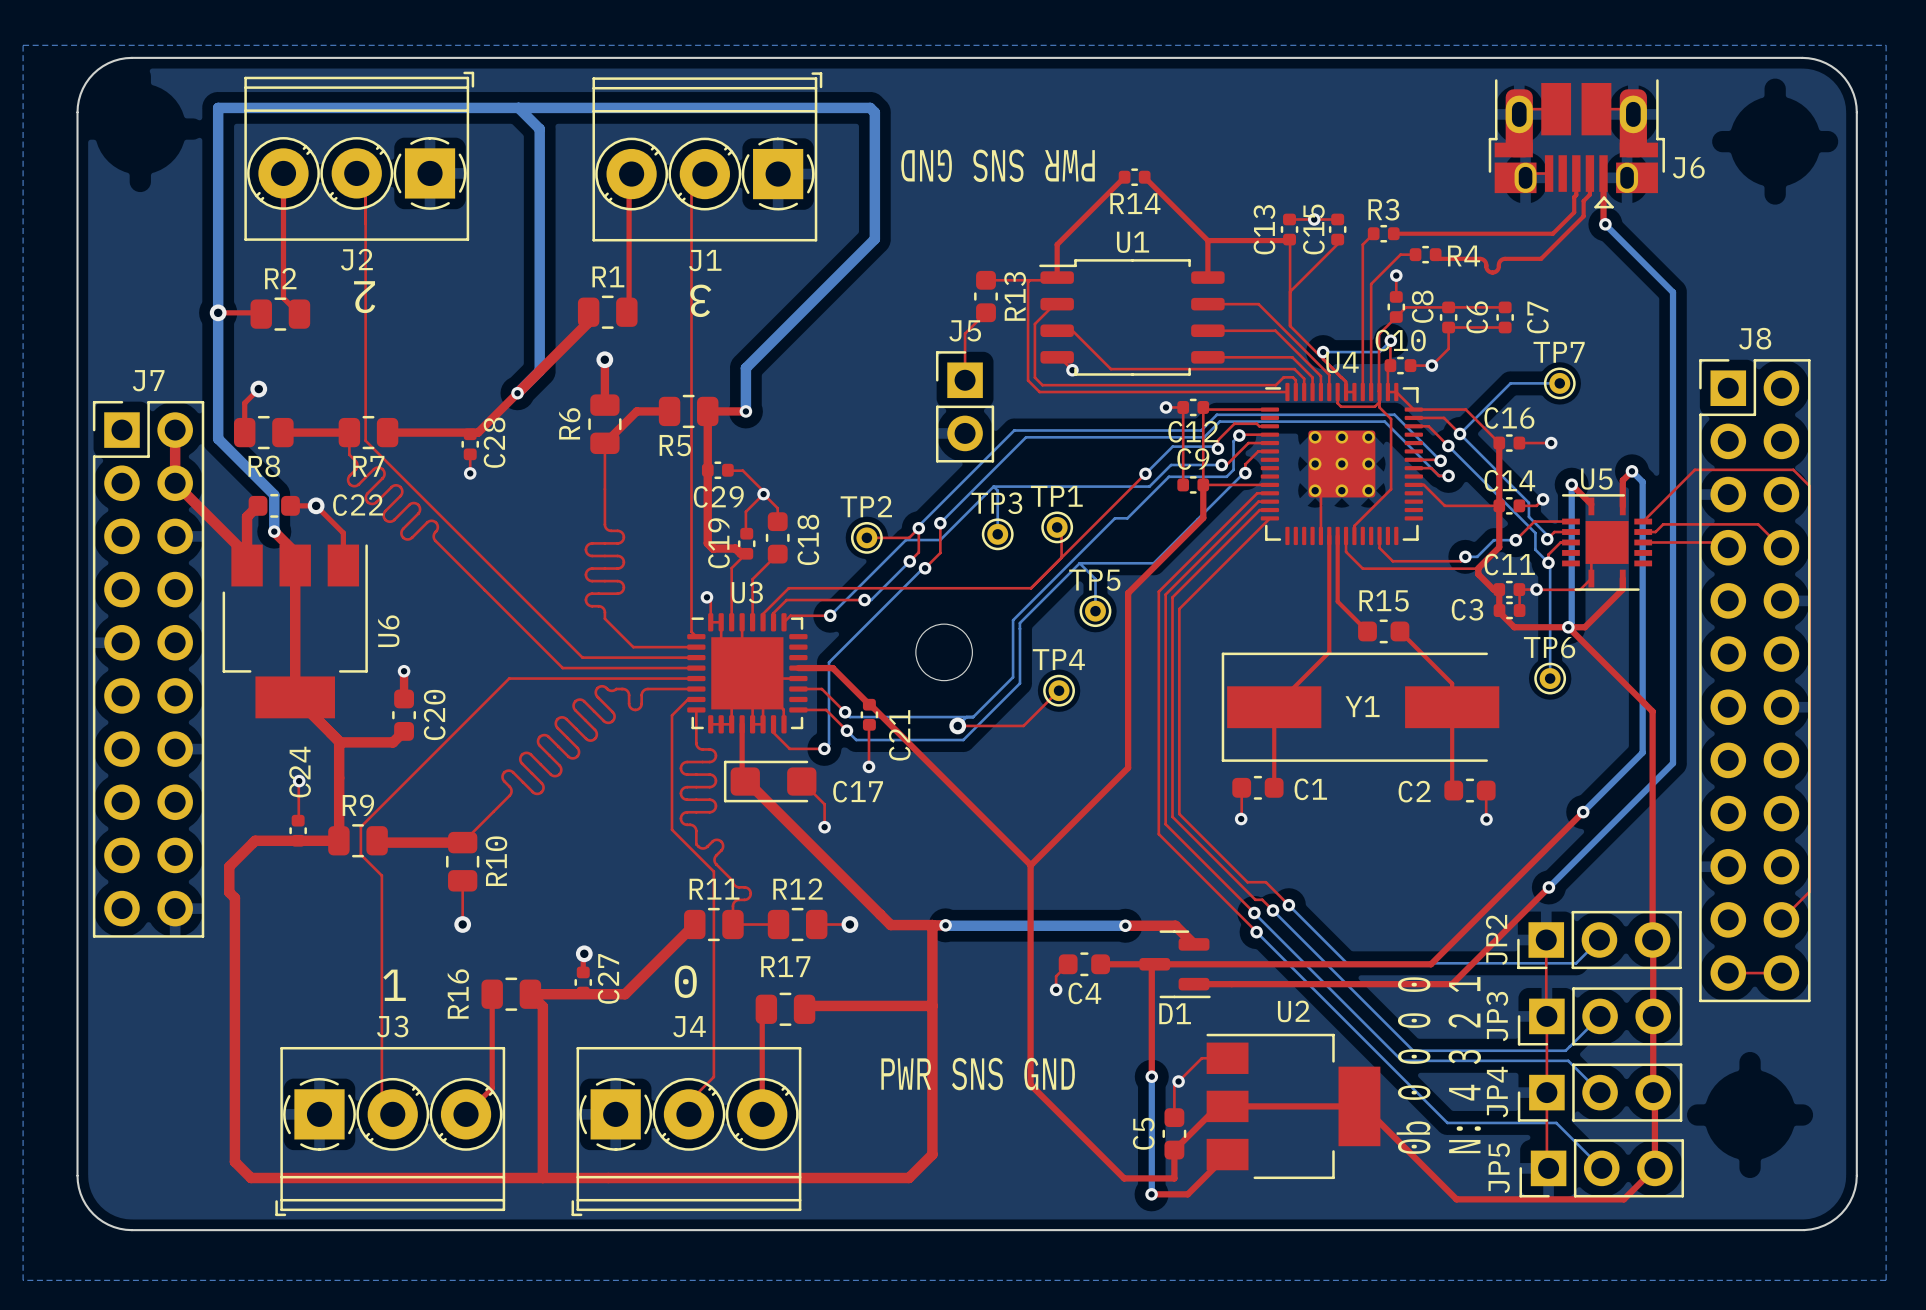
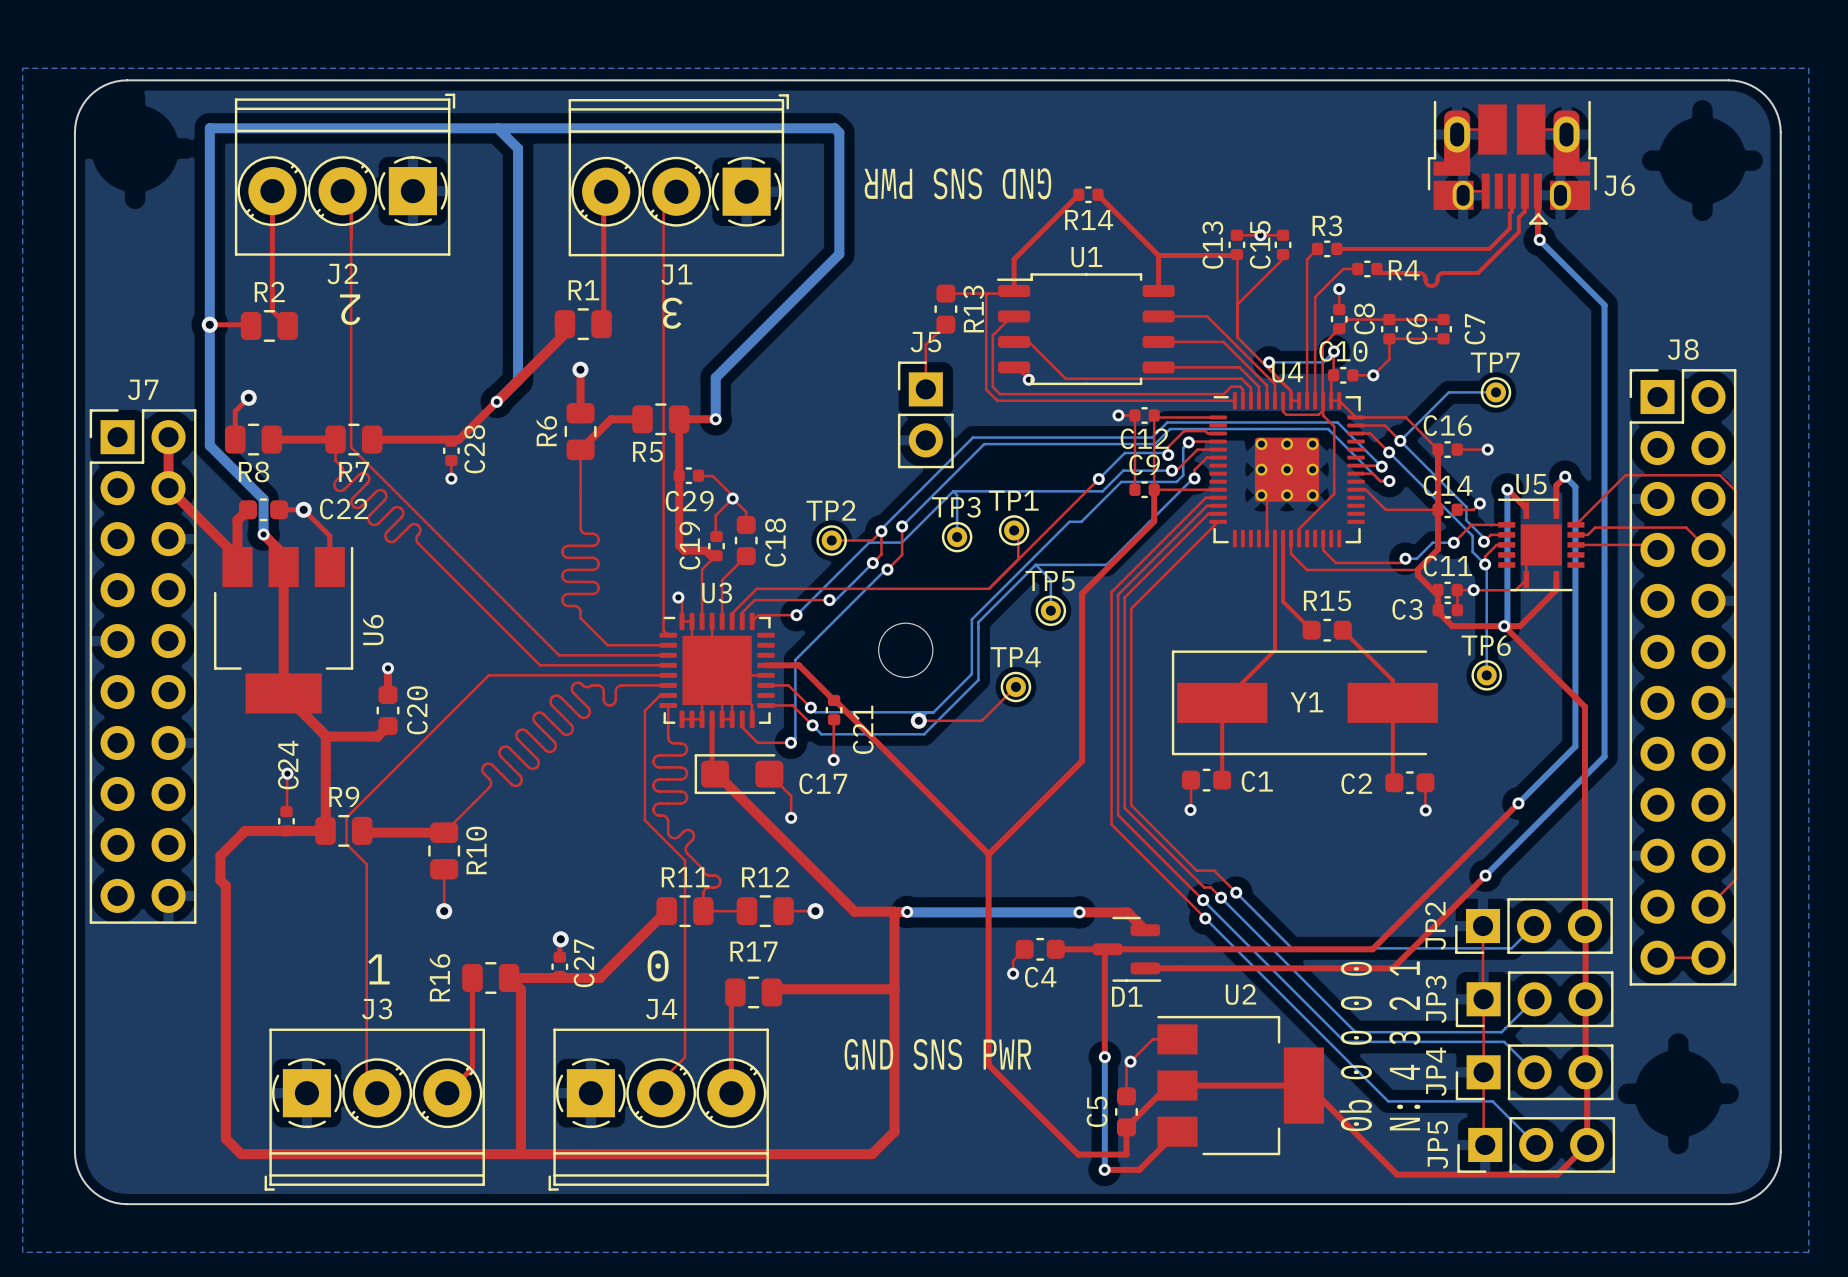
text: PWR SNS GND (998, 165) -> GND SNS PWR (957, 183)
text: PWR SNS GND (978, 1074) -> GND SNS PWR (937, 1054)

